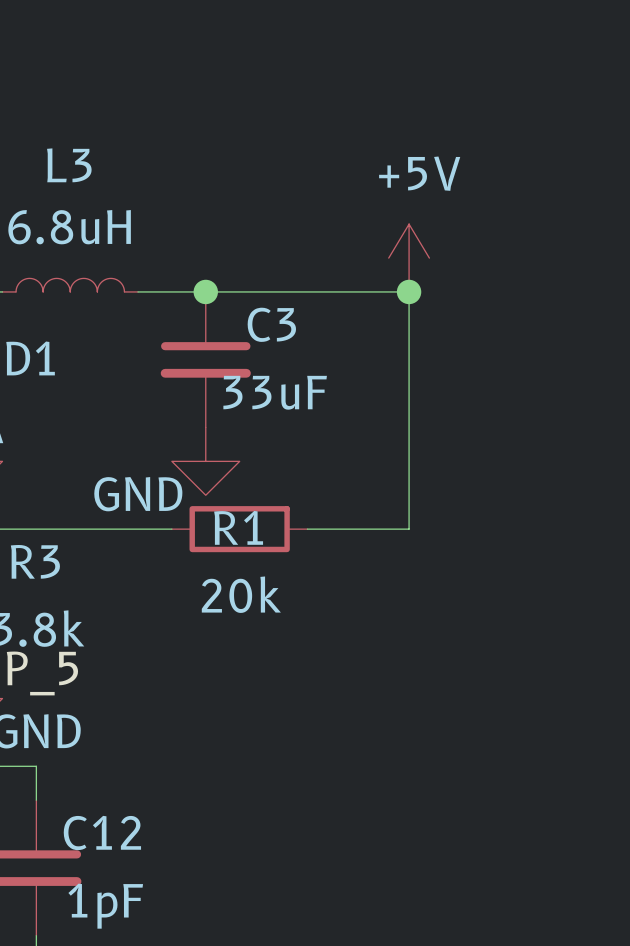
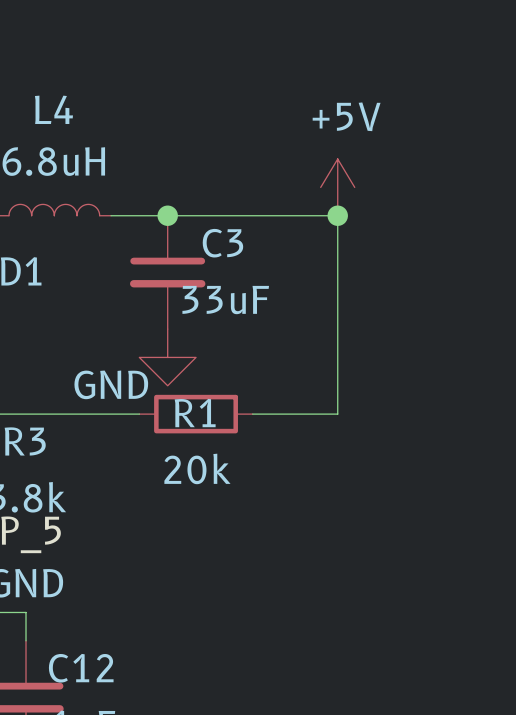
L3 name: L3 (69, 165) -> L4 (53, 109)

